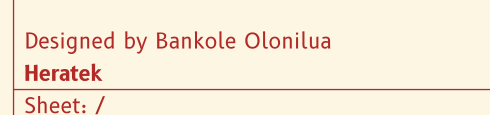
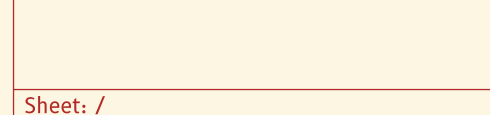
title block: Designed by Bankole Olonilua (178, 42) -> none
title block: Heratek (63, 72) -> none

